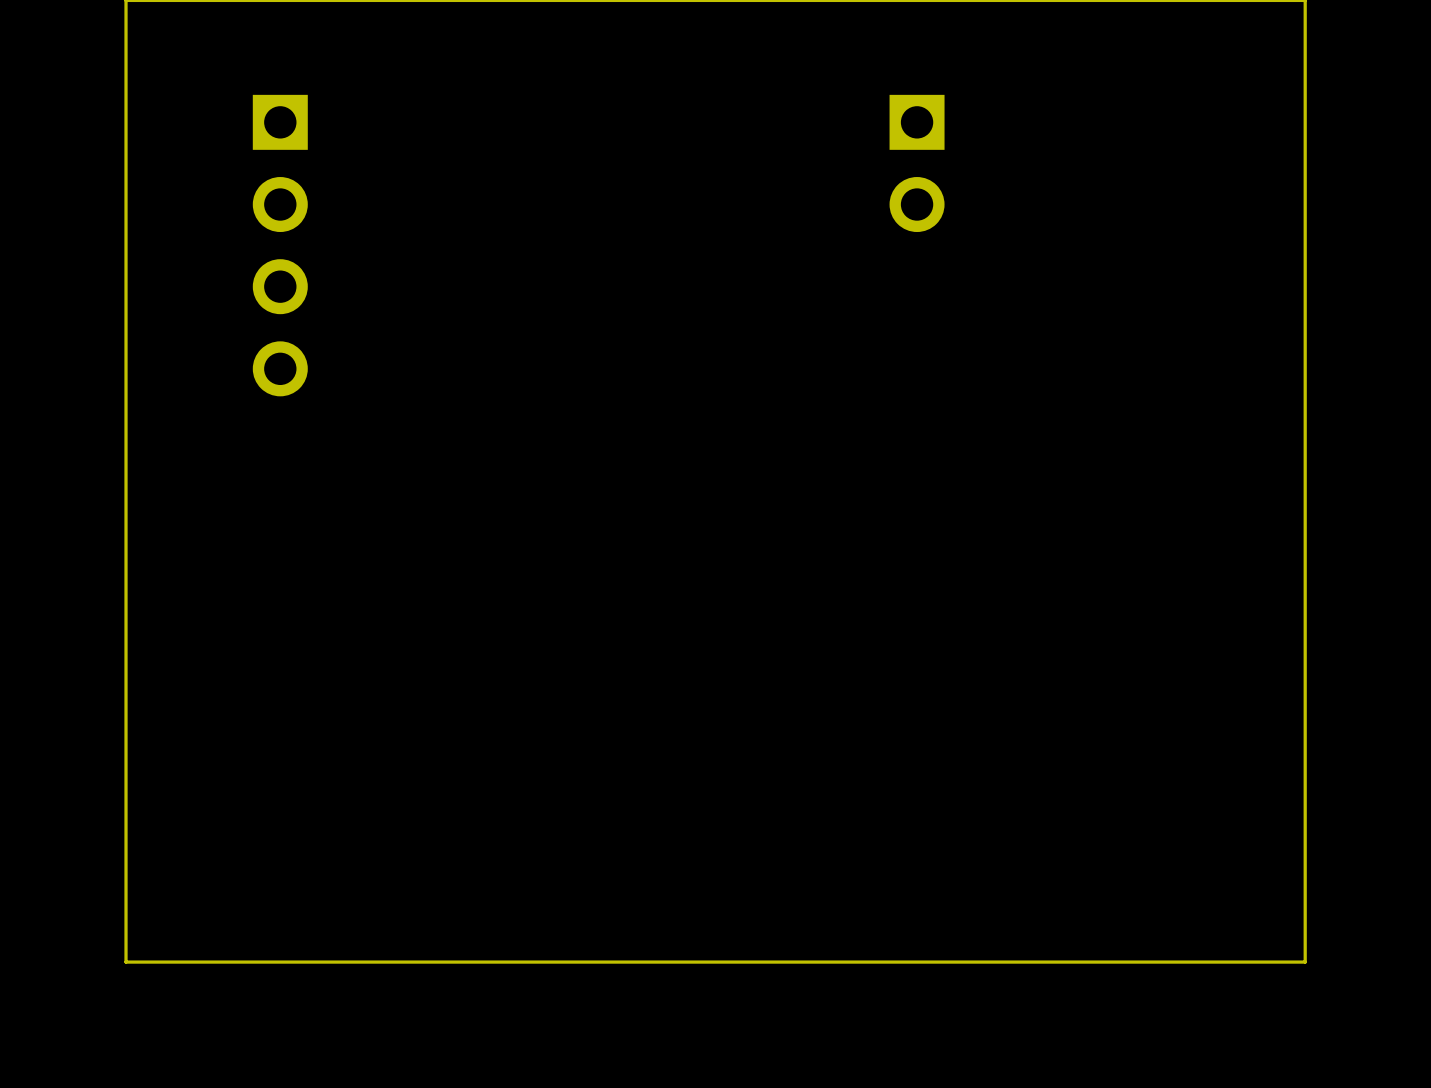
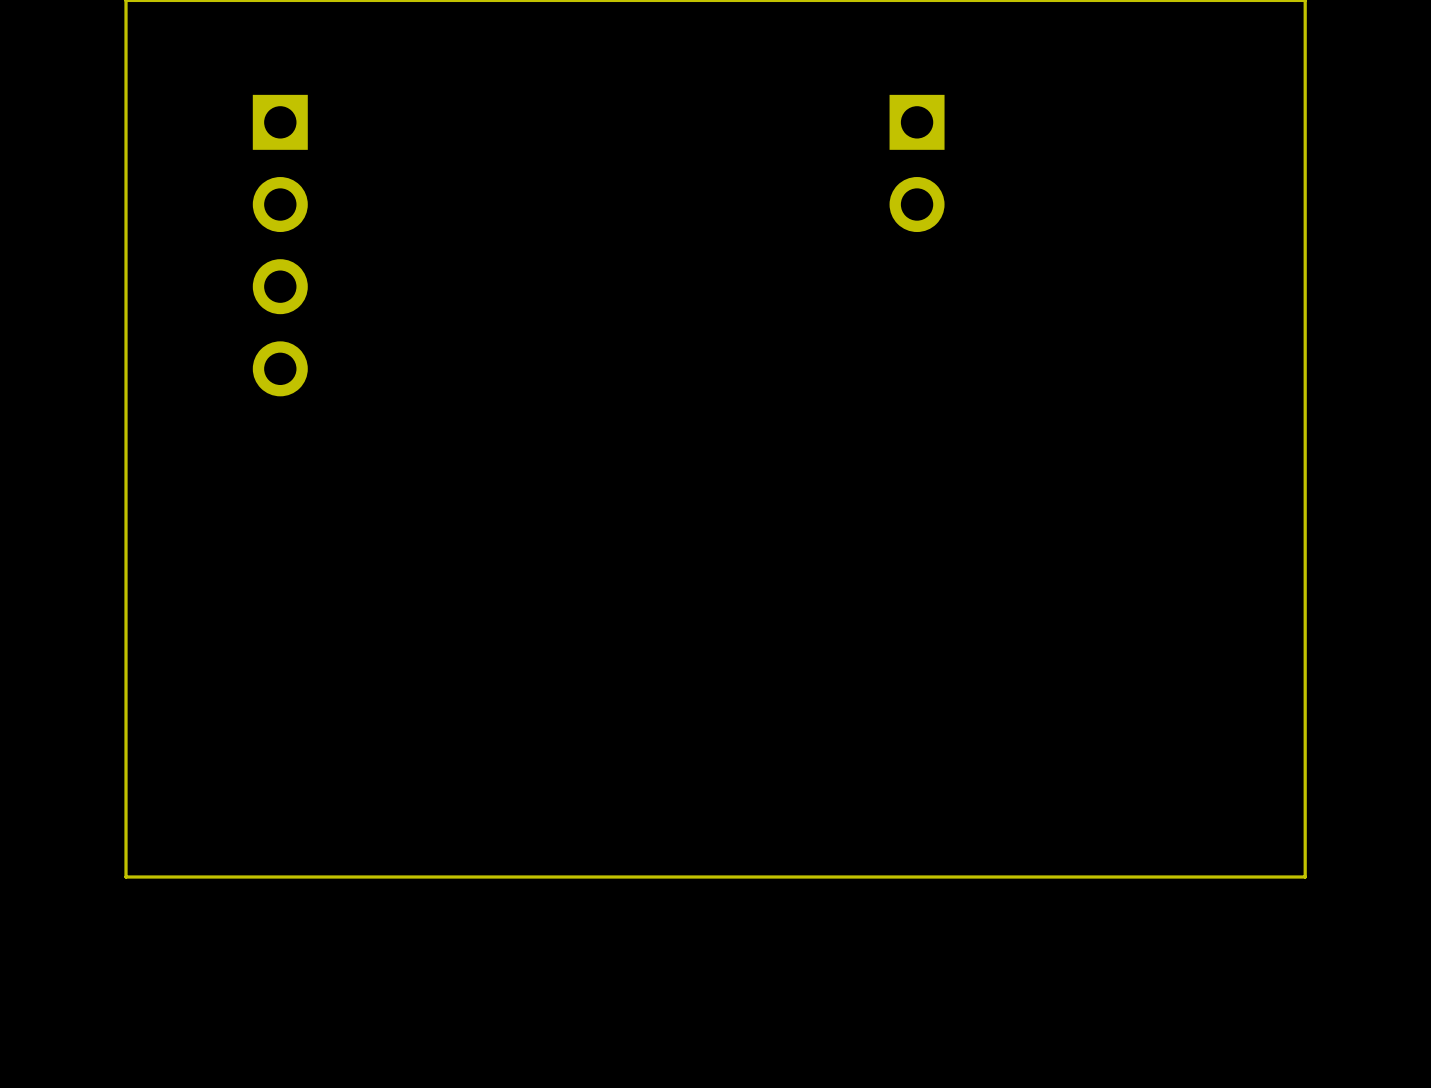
board edge: (1305, 877) (1305, 962) (126, 962) (126, 877) -> (1305, 877) (126, 877)

